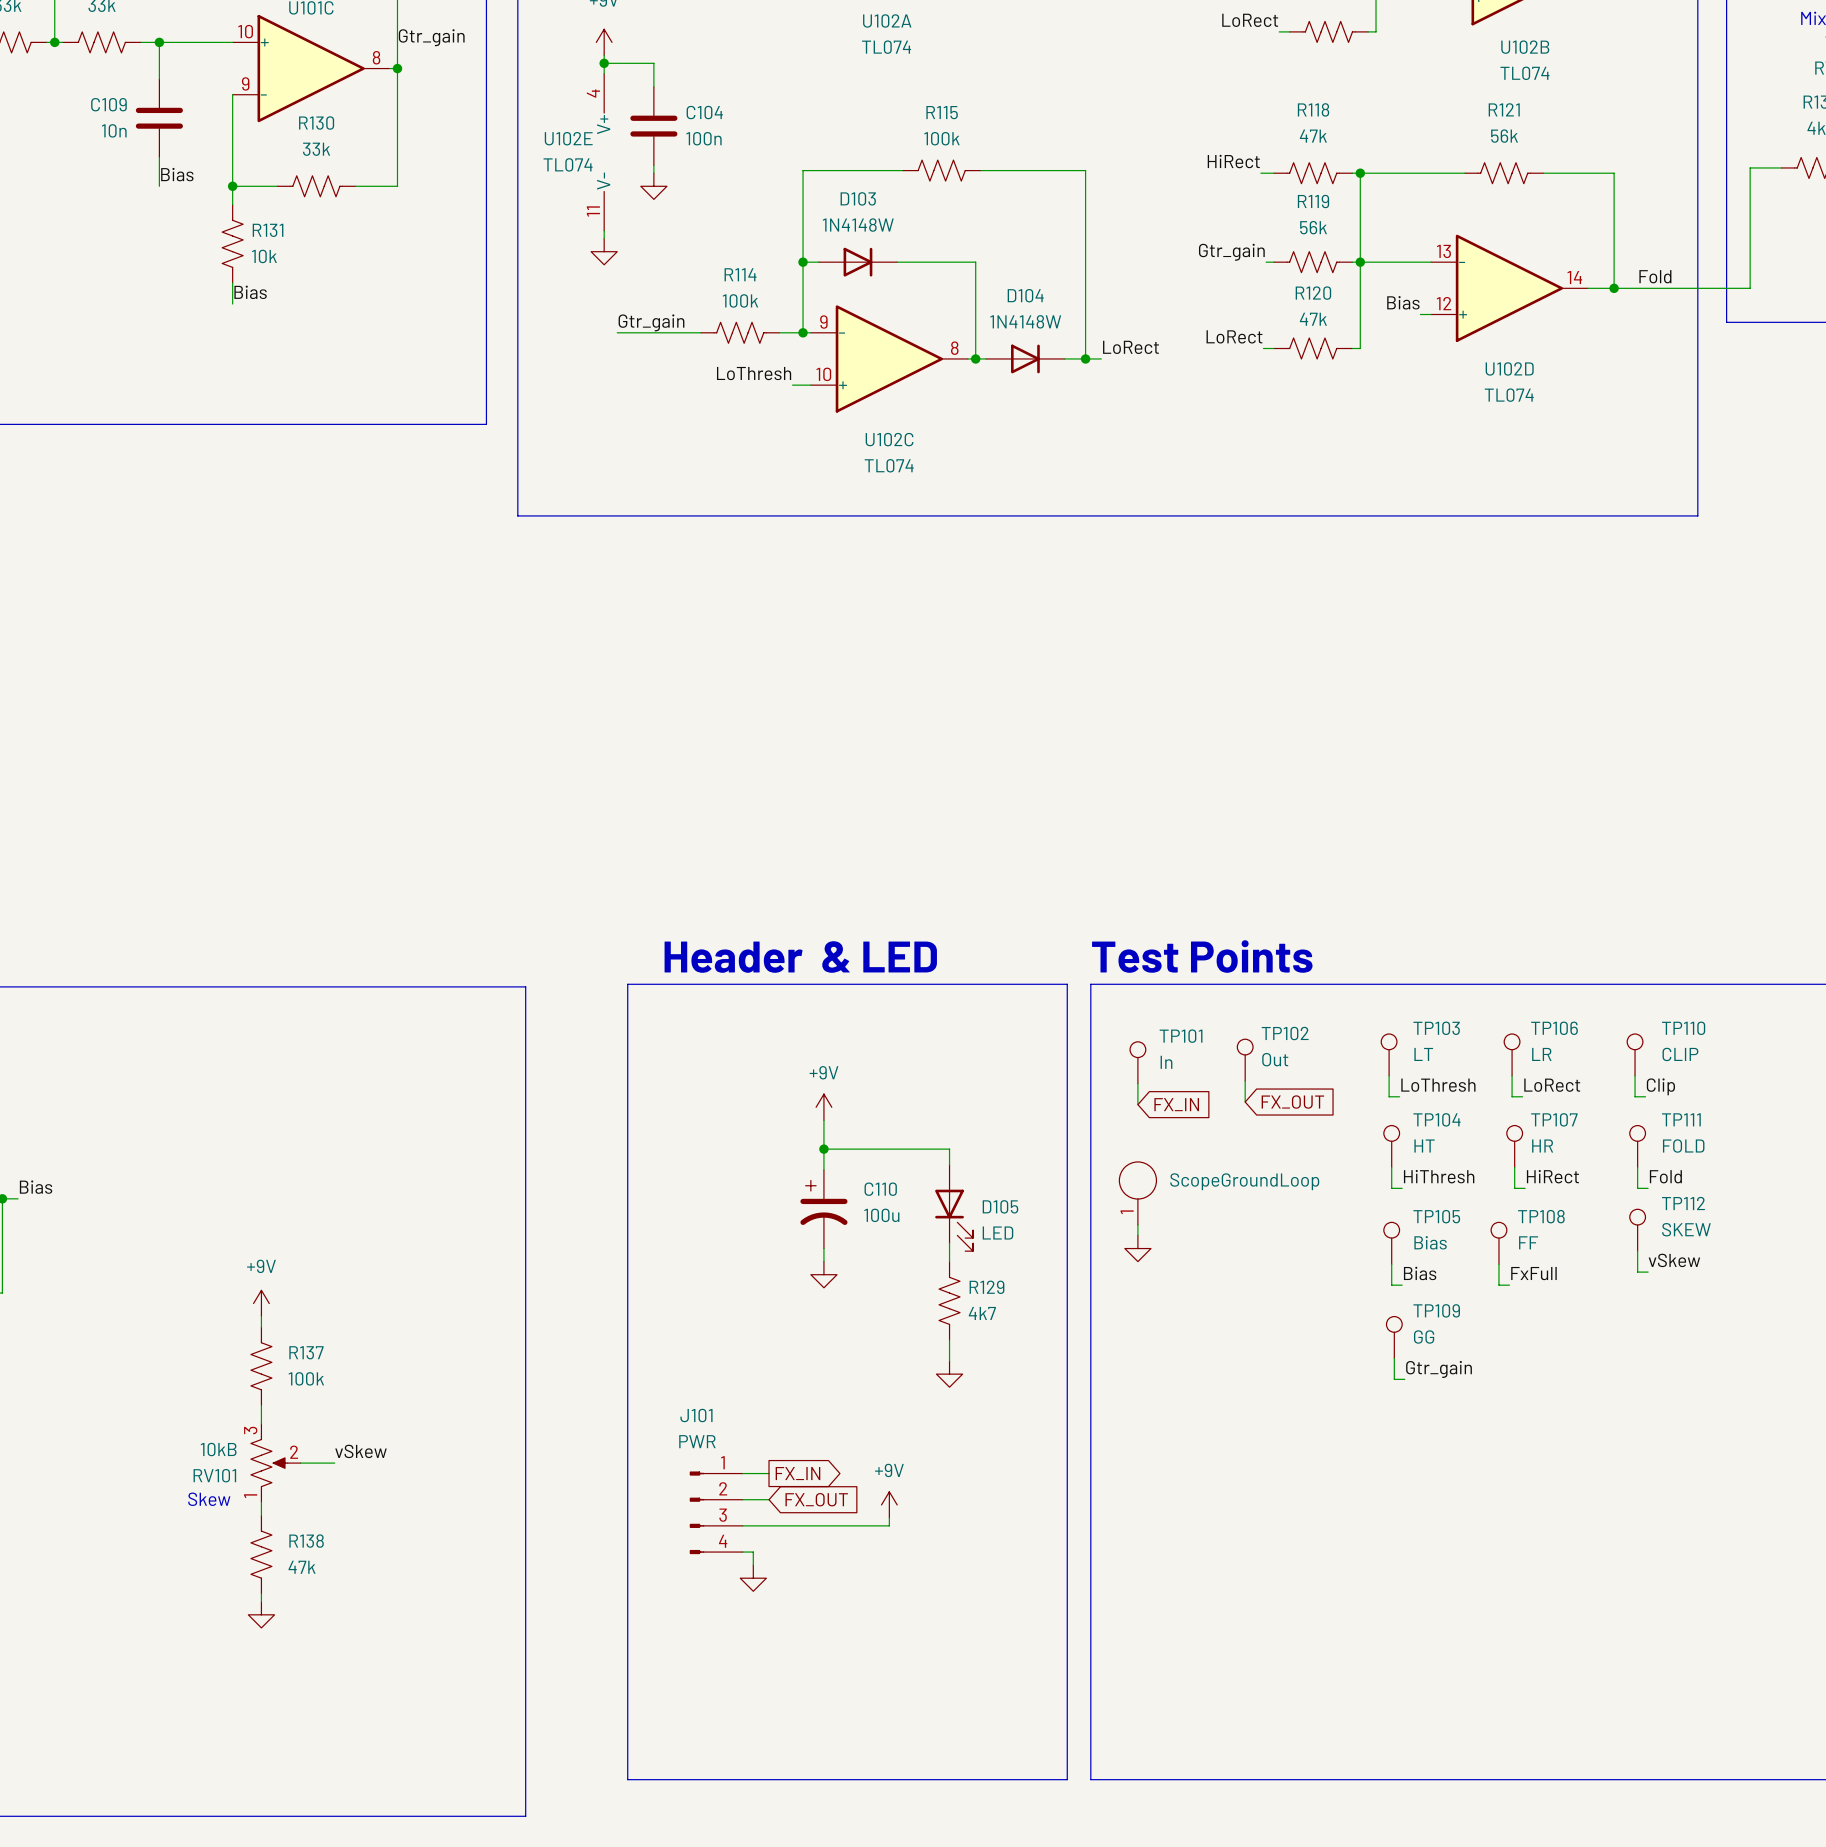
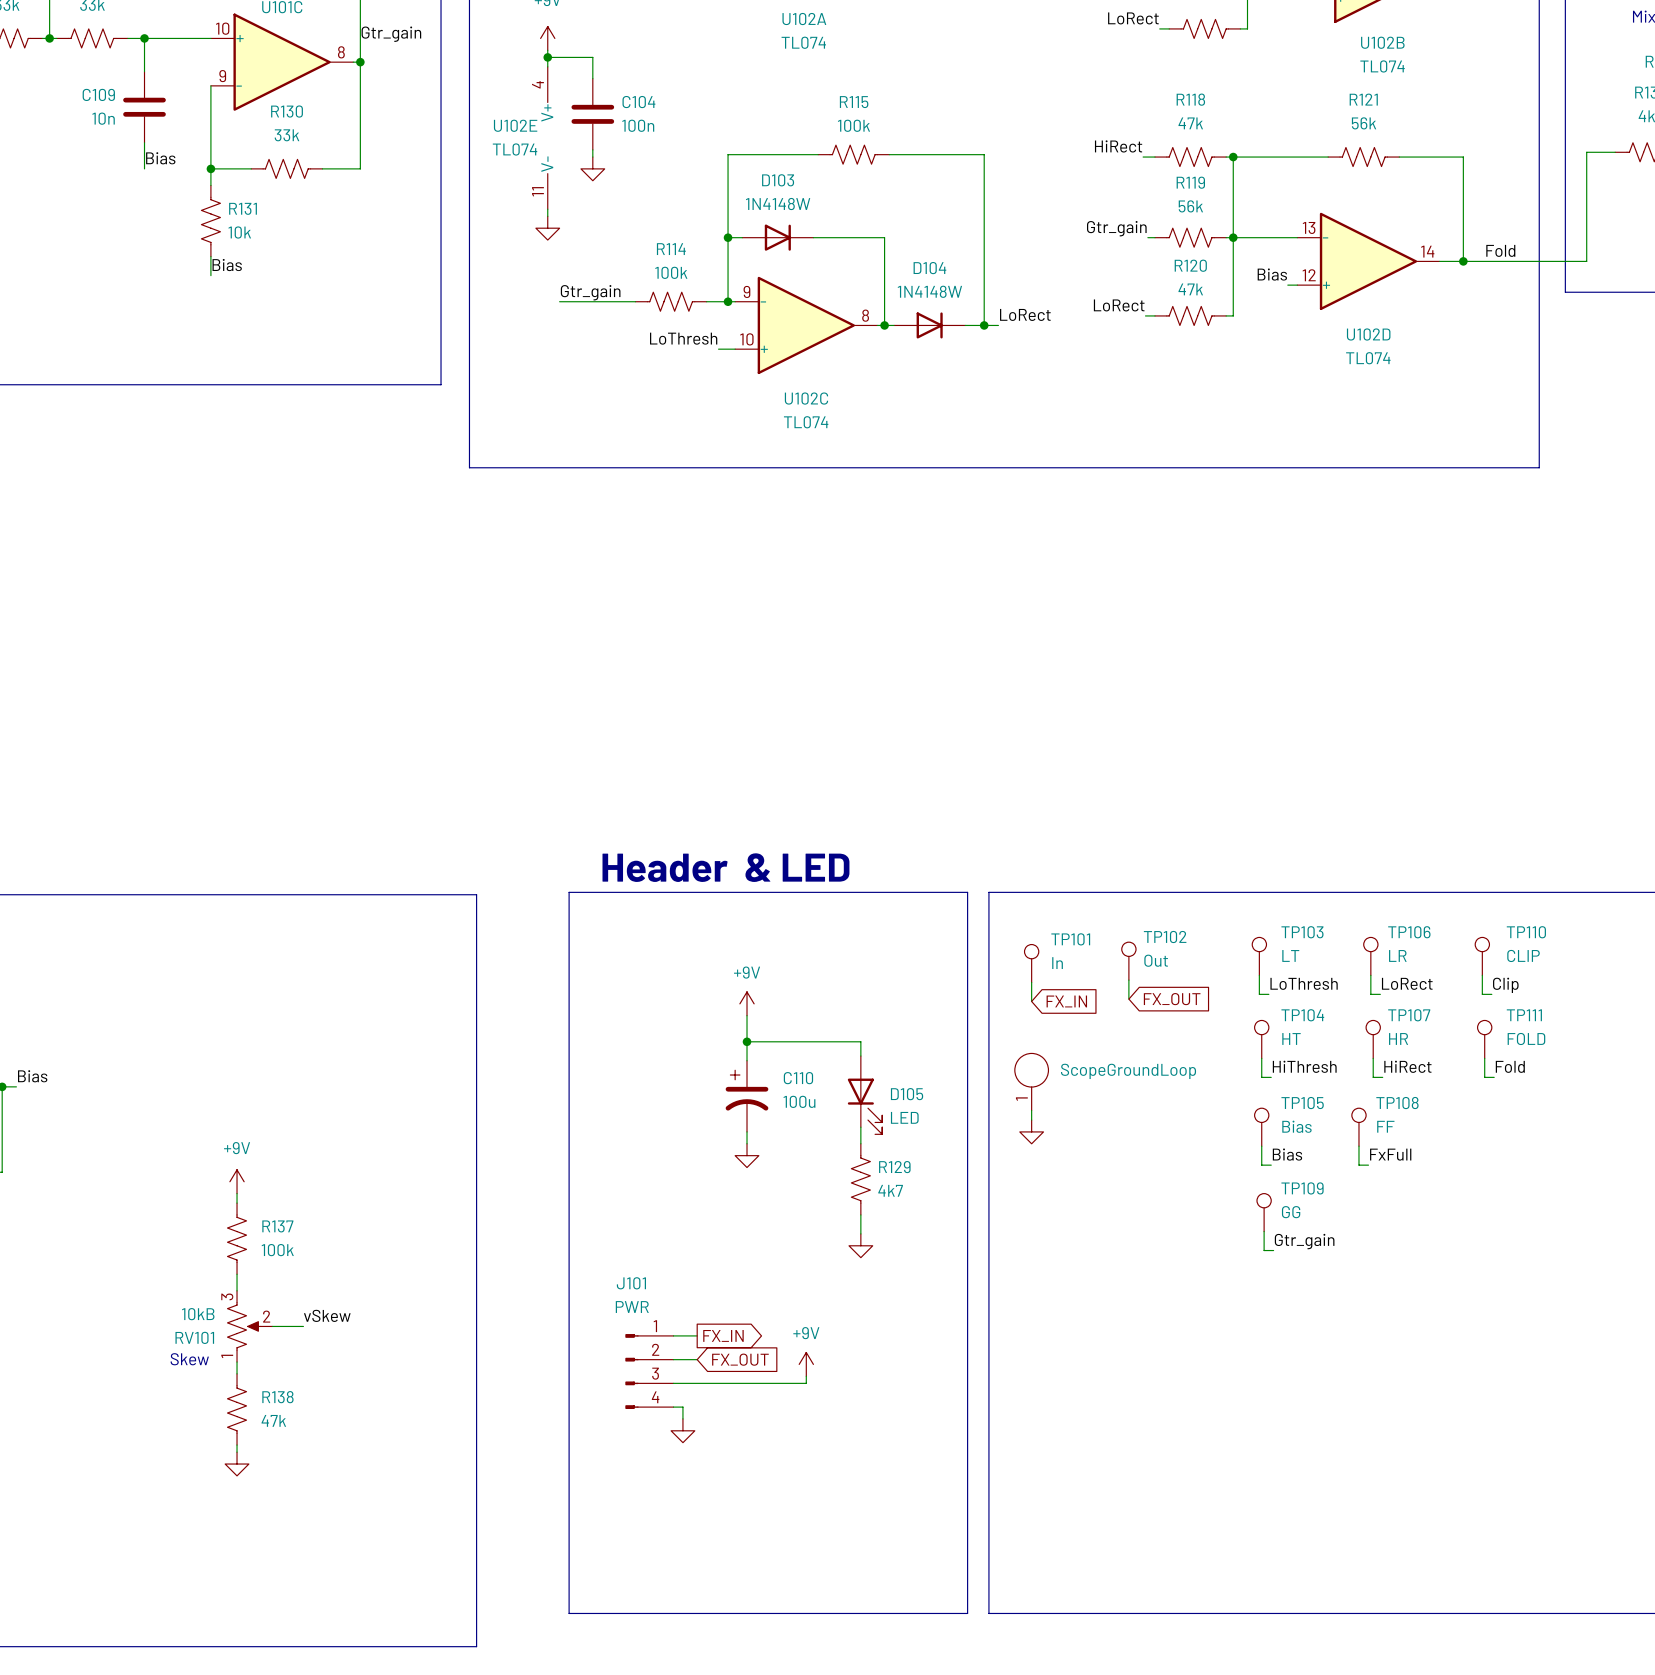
text: Test Points (1202, 956) -> none
TP112: SKEW (1637, 1230) -> none
wire: (1637, 1251) (1637, 1272) (1648, 1272) -> none
label: vSkew (1674, 1260) -> none

